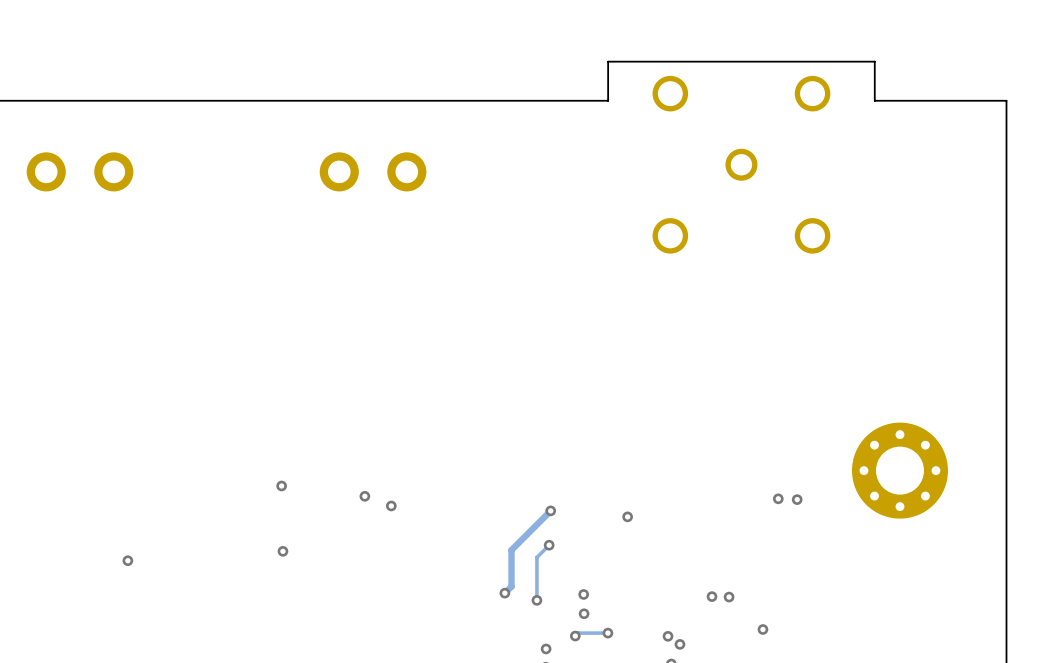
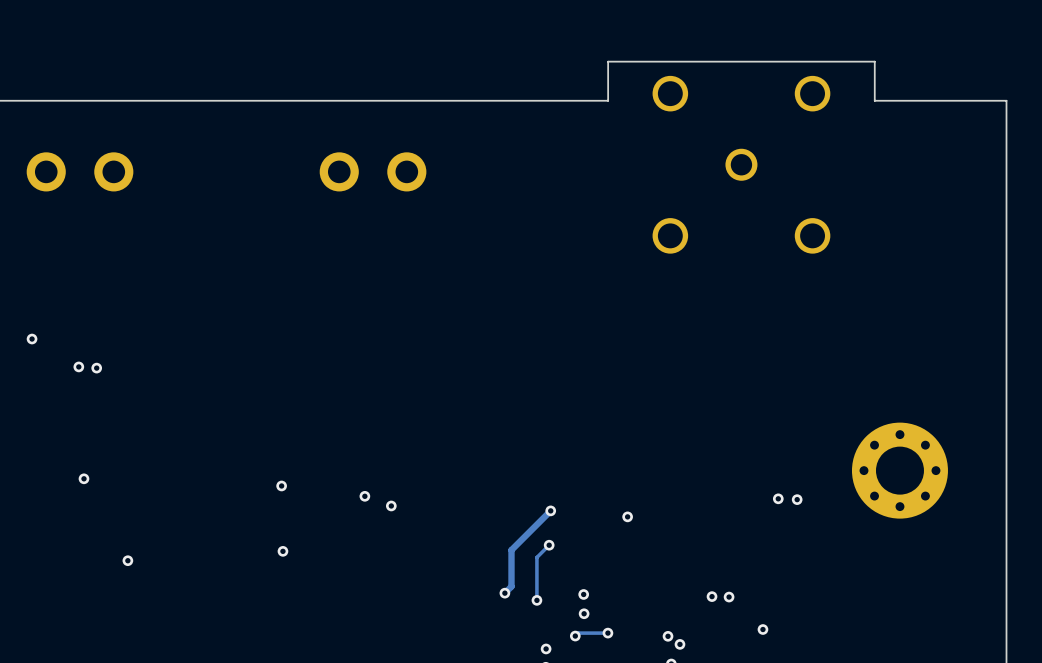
via: none -> (32, 339)
via: none -> (78, 366)
via: none -> (96, 368)
via: none -> (83, 478)

